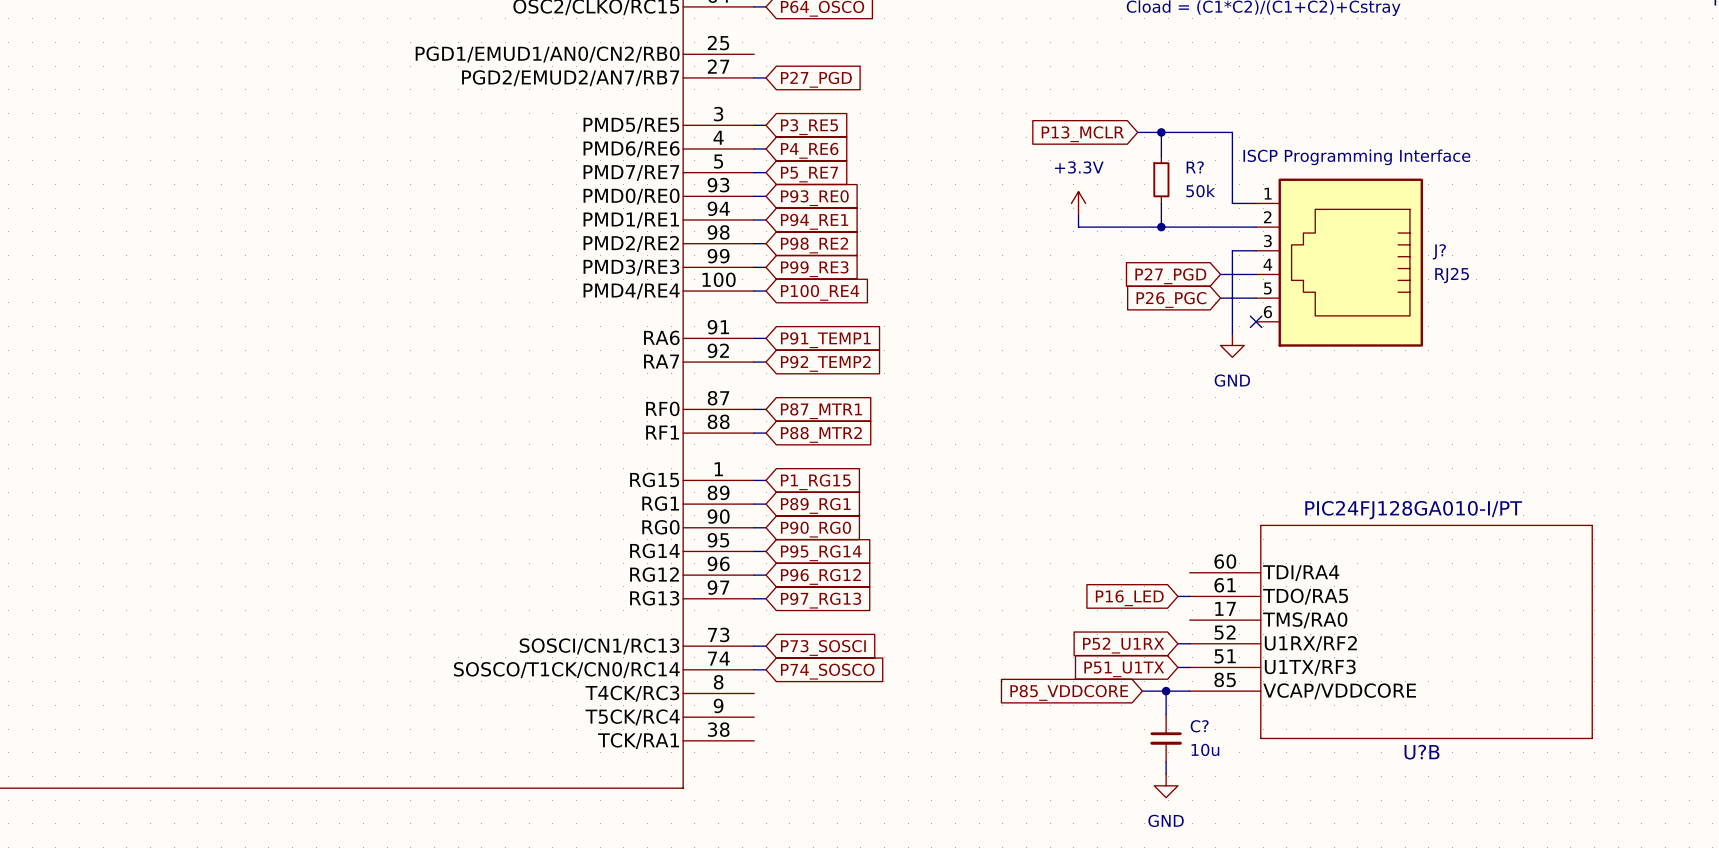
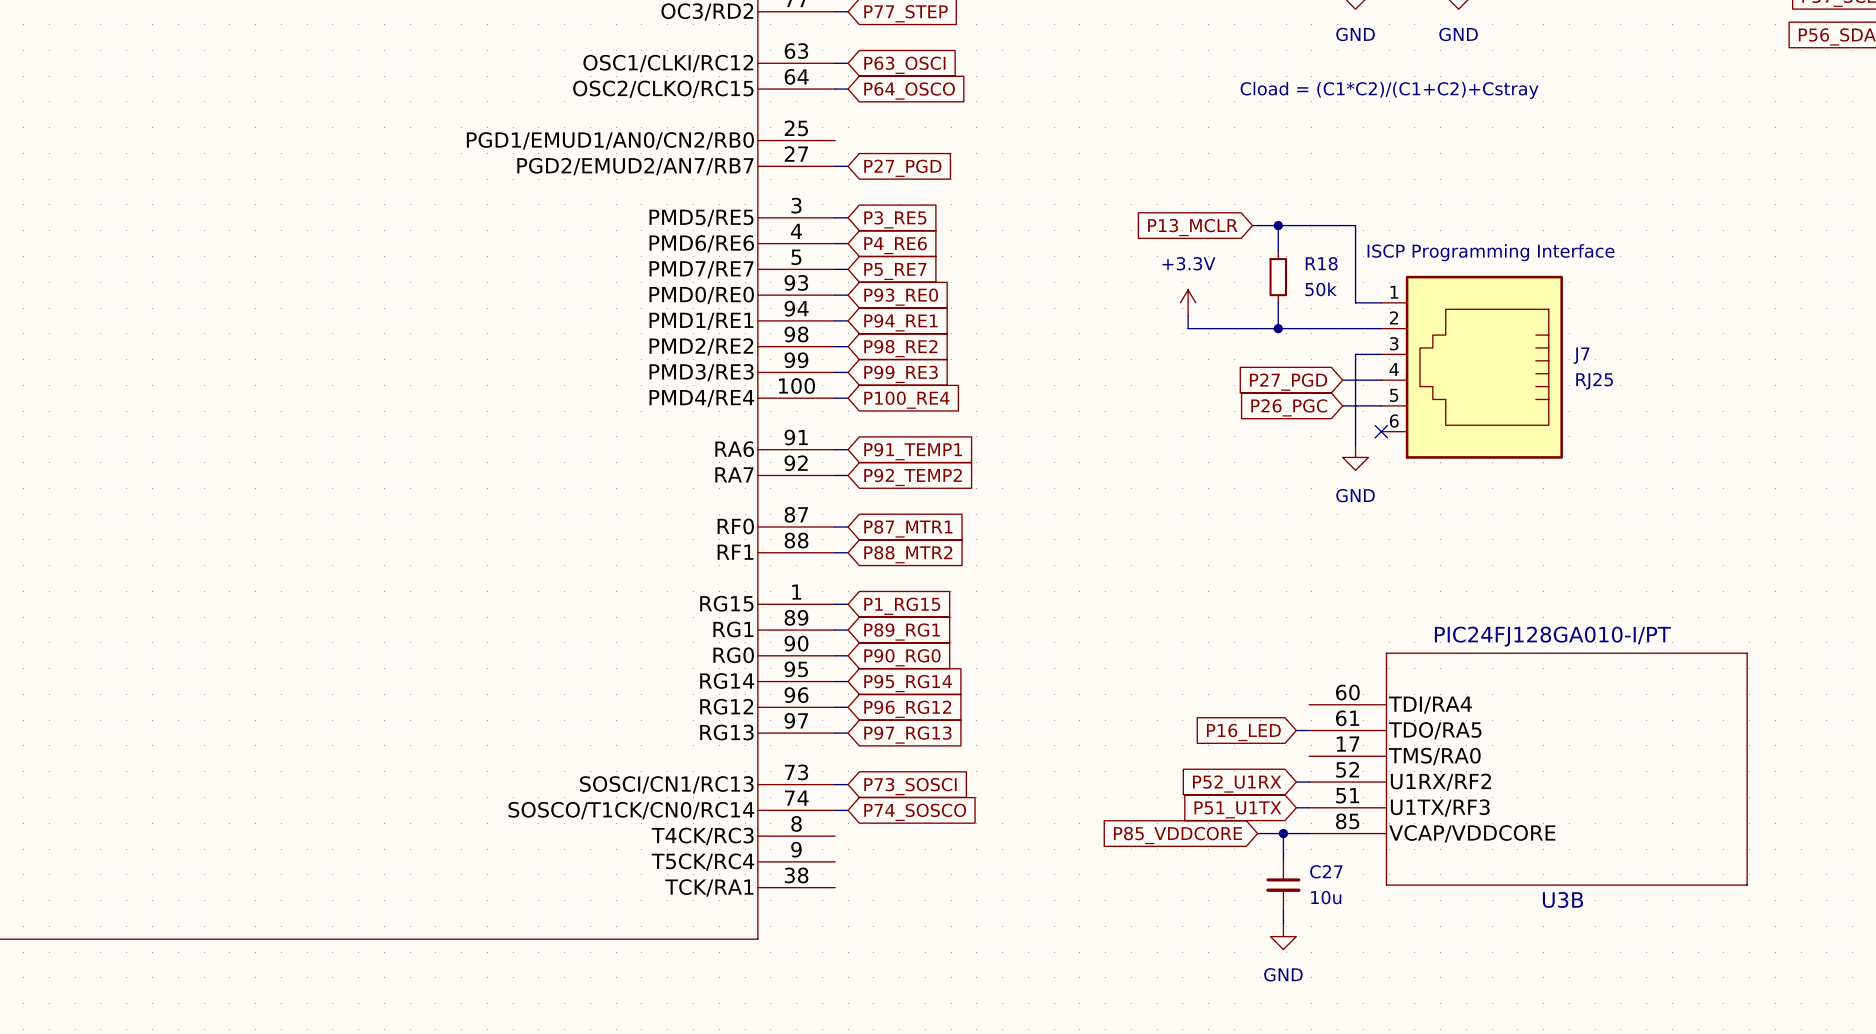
R? name: R? (1195, 167) -> R18 (1321, 263)
J? name: J? (1439, 251) -> J7 (1581, 355)
C? name: C? (1199, 726) -> C27 (1326, 871)
U?B name: U?B (1421, 752) -> U3B (1562, 899)

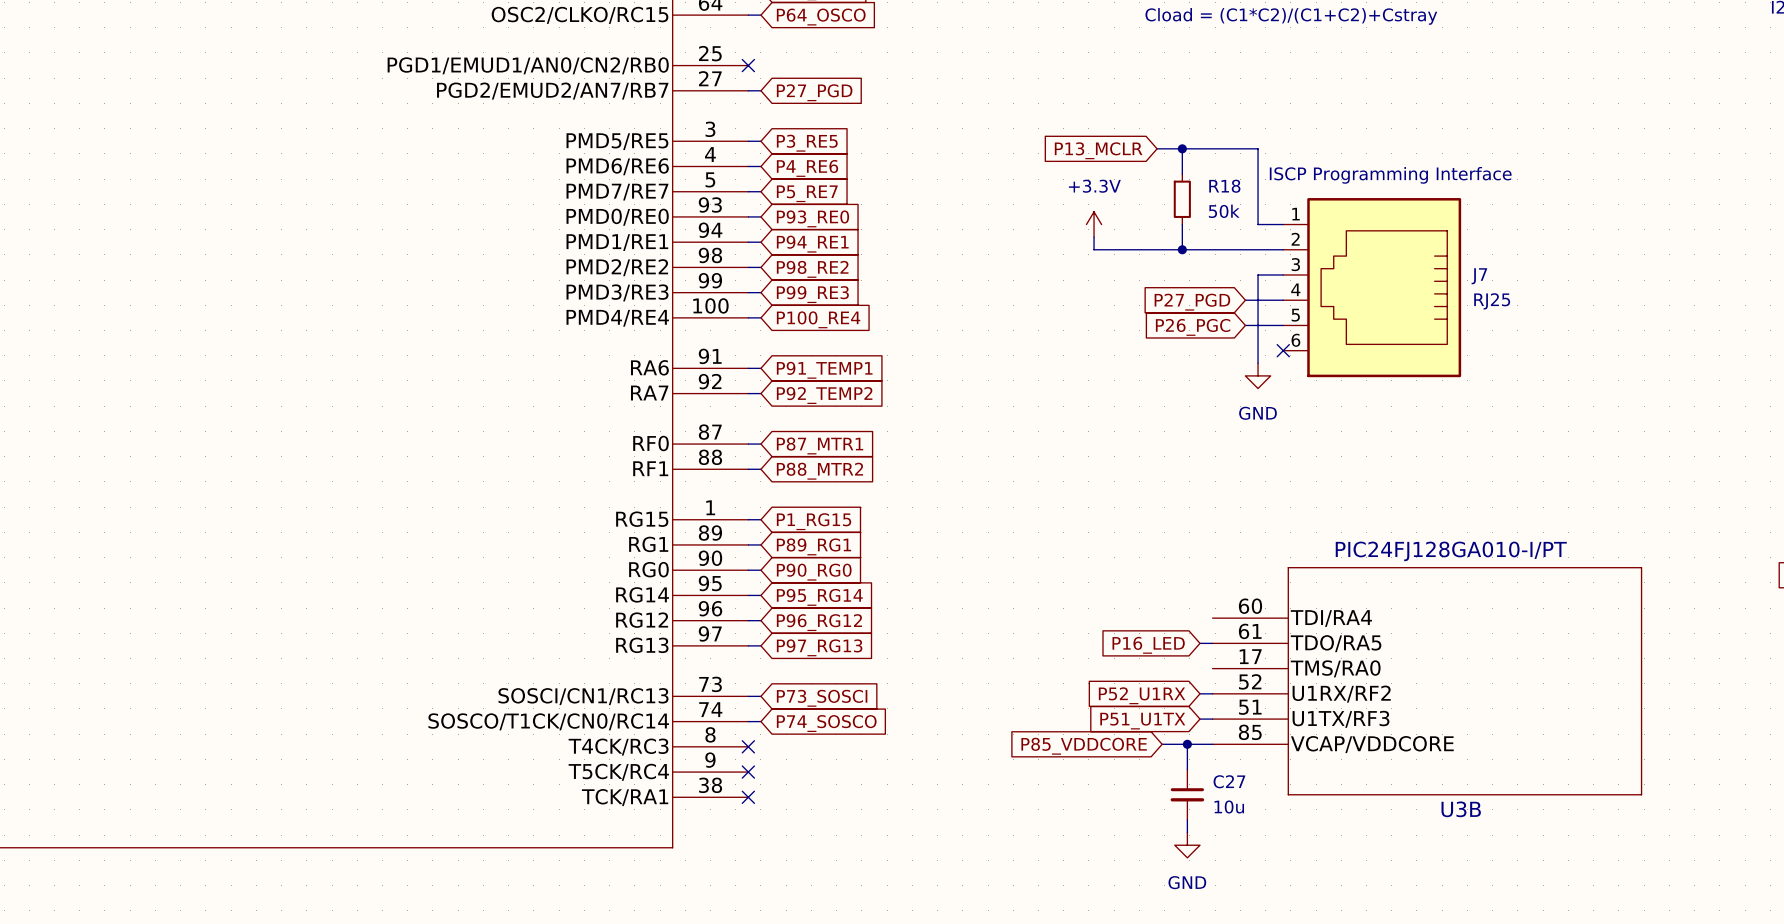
no-connect mark: none -> (748, 65)
no-connect mark: none -> (748, 746)
no-connect mark: none -> (748, 772)
no-connect mark: none -> (748, 797)

